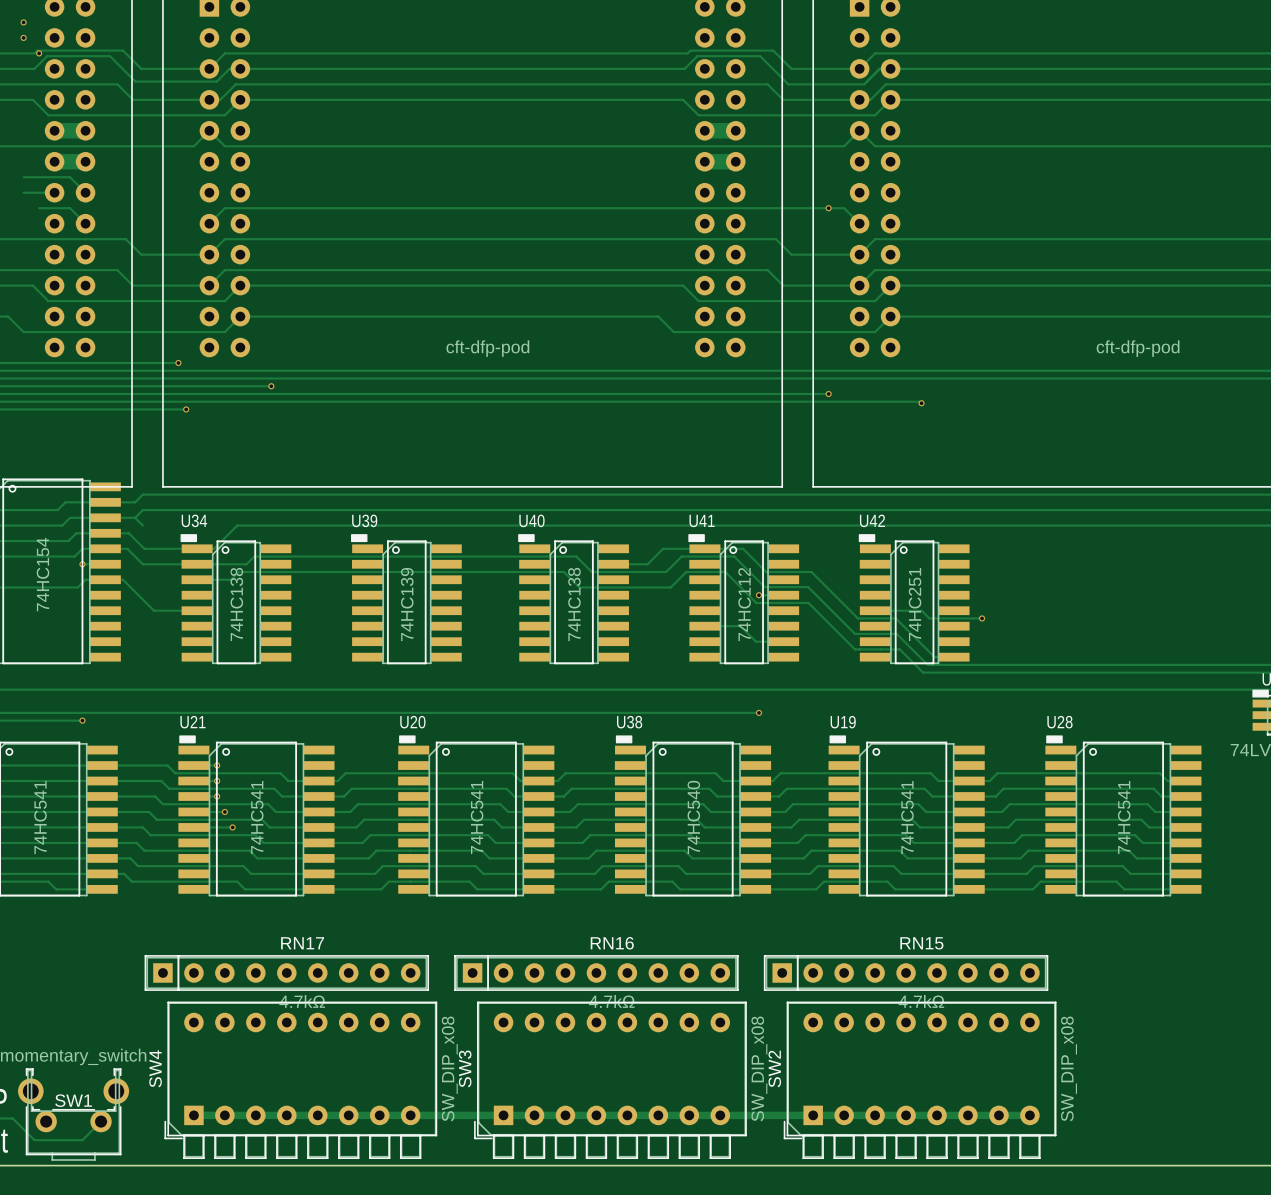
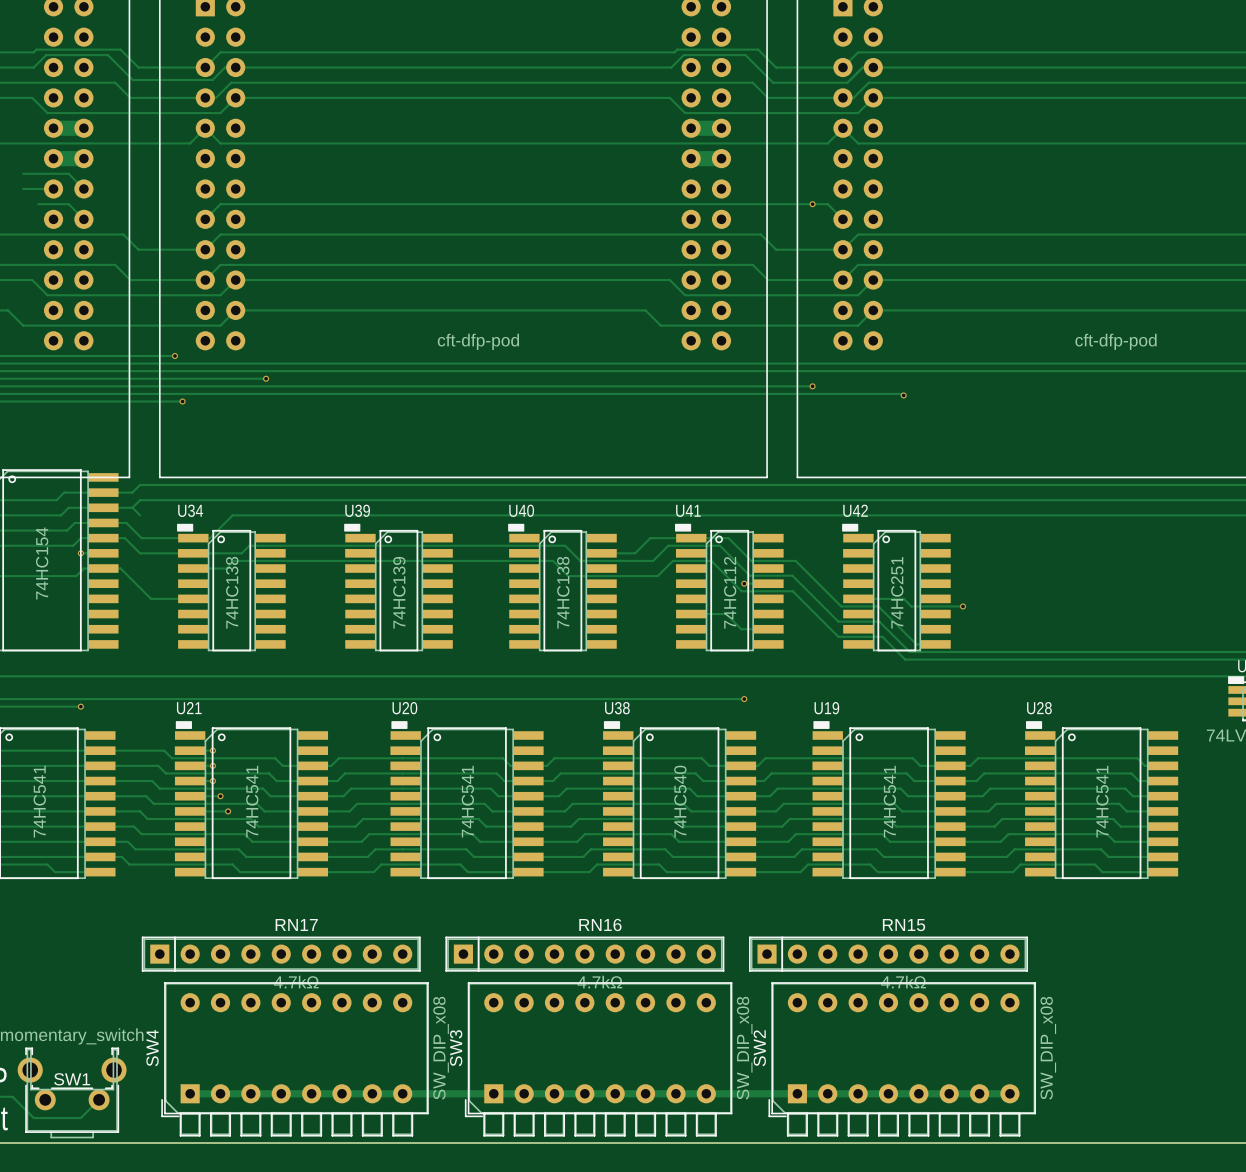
via: (23, 22) -> none
via: (23, 37) -> none
via: (39, 53) -> none

